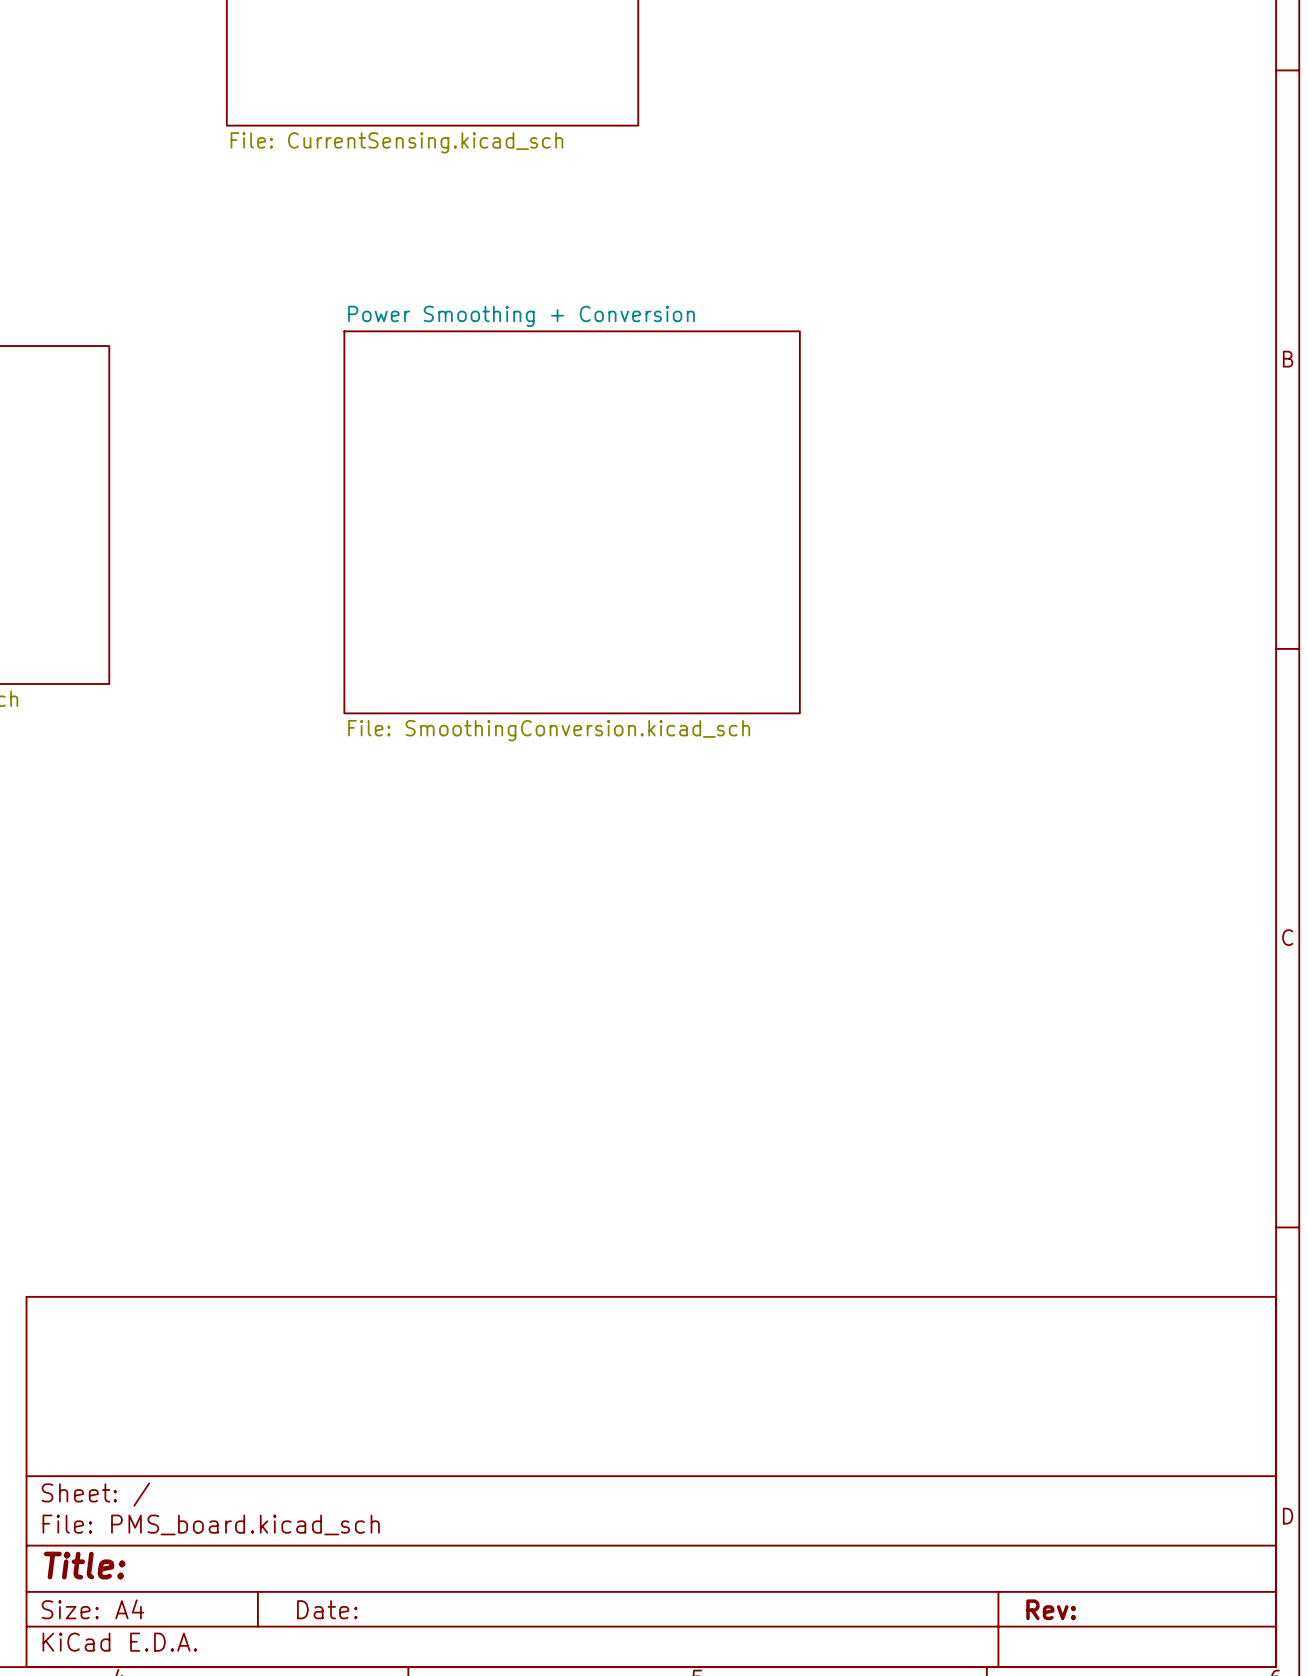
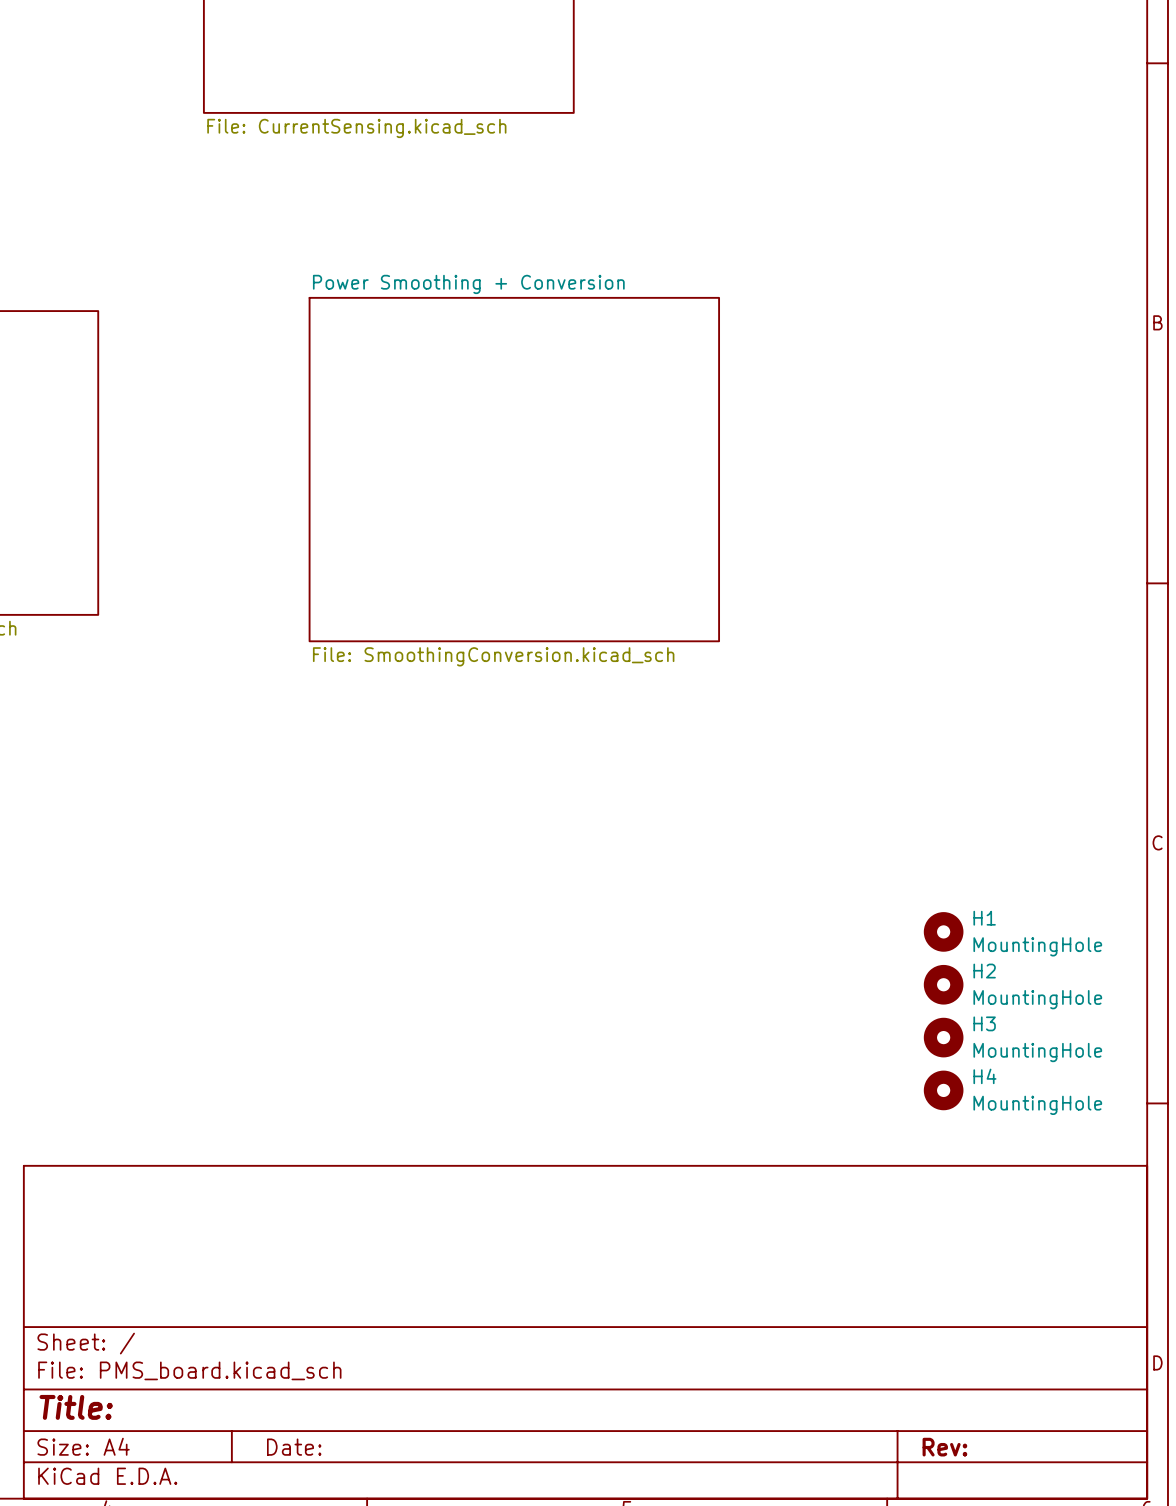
H1: none -> MountingHole (943, 931)
H2: none -> MountingHole (943, 984)
H3: none -> MountingHole (943, 1037)
H4: none -> MountingHole (943, 1090)

